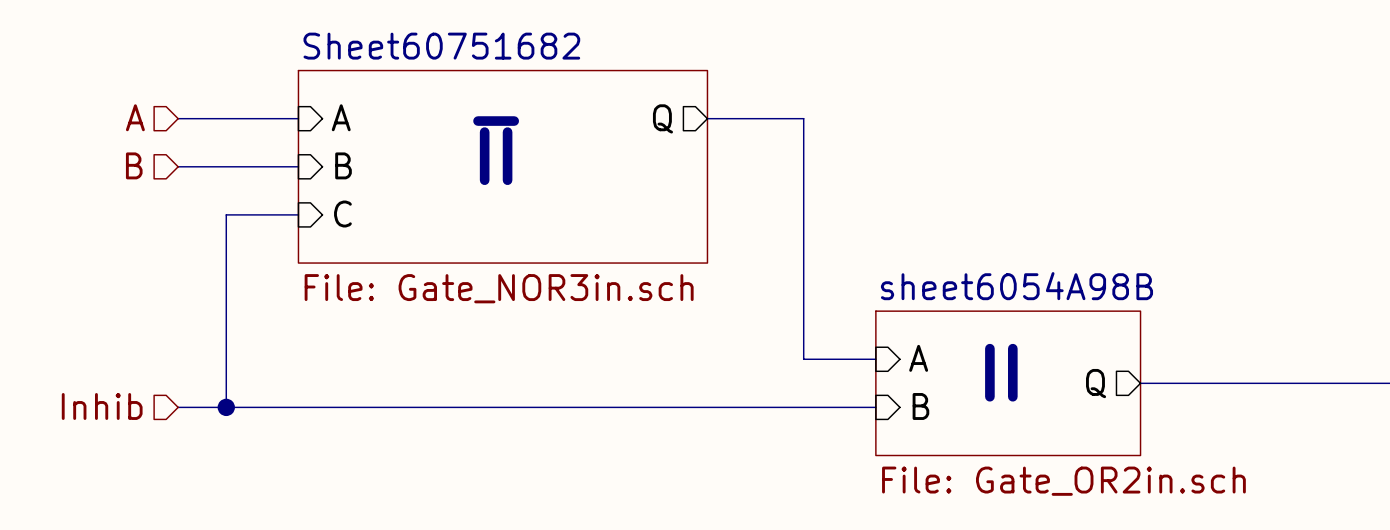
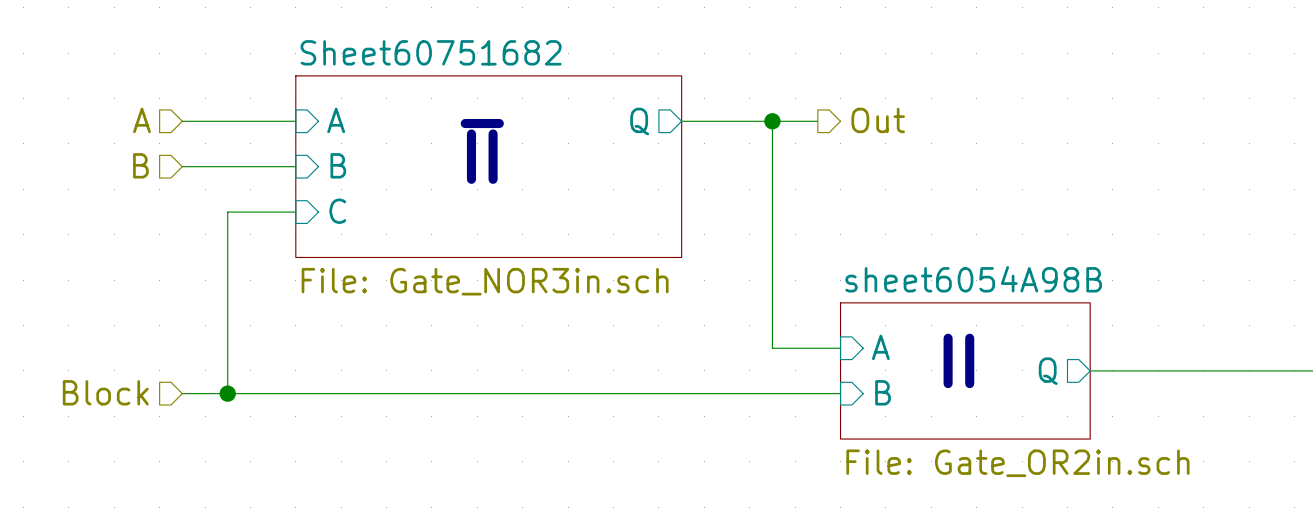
hierarchical label: none -> Out (878, 120)
wire: none -> (772, 121) (817, 121)
junction: none -> (772, 121)
hierarchical label: Inhib (102, 406) -> Block (105, 392)

